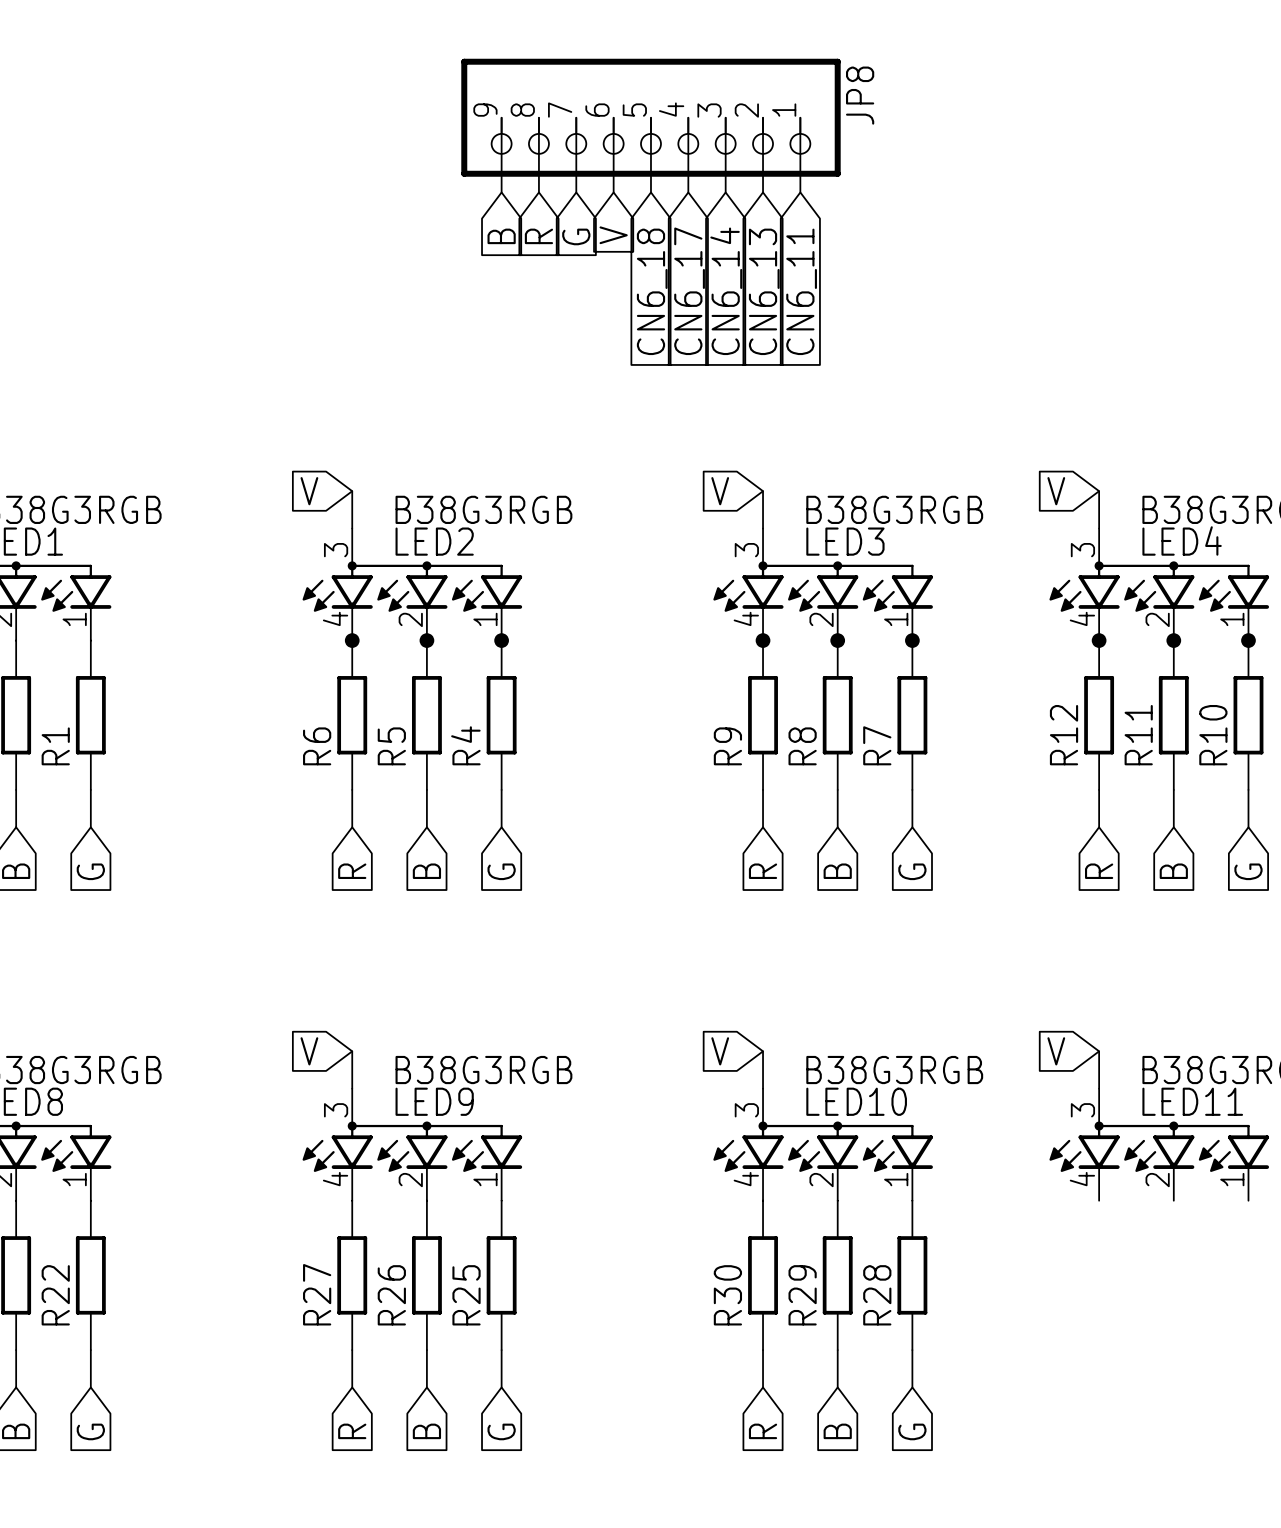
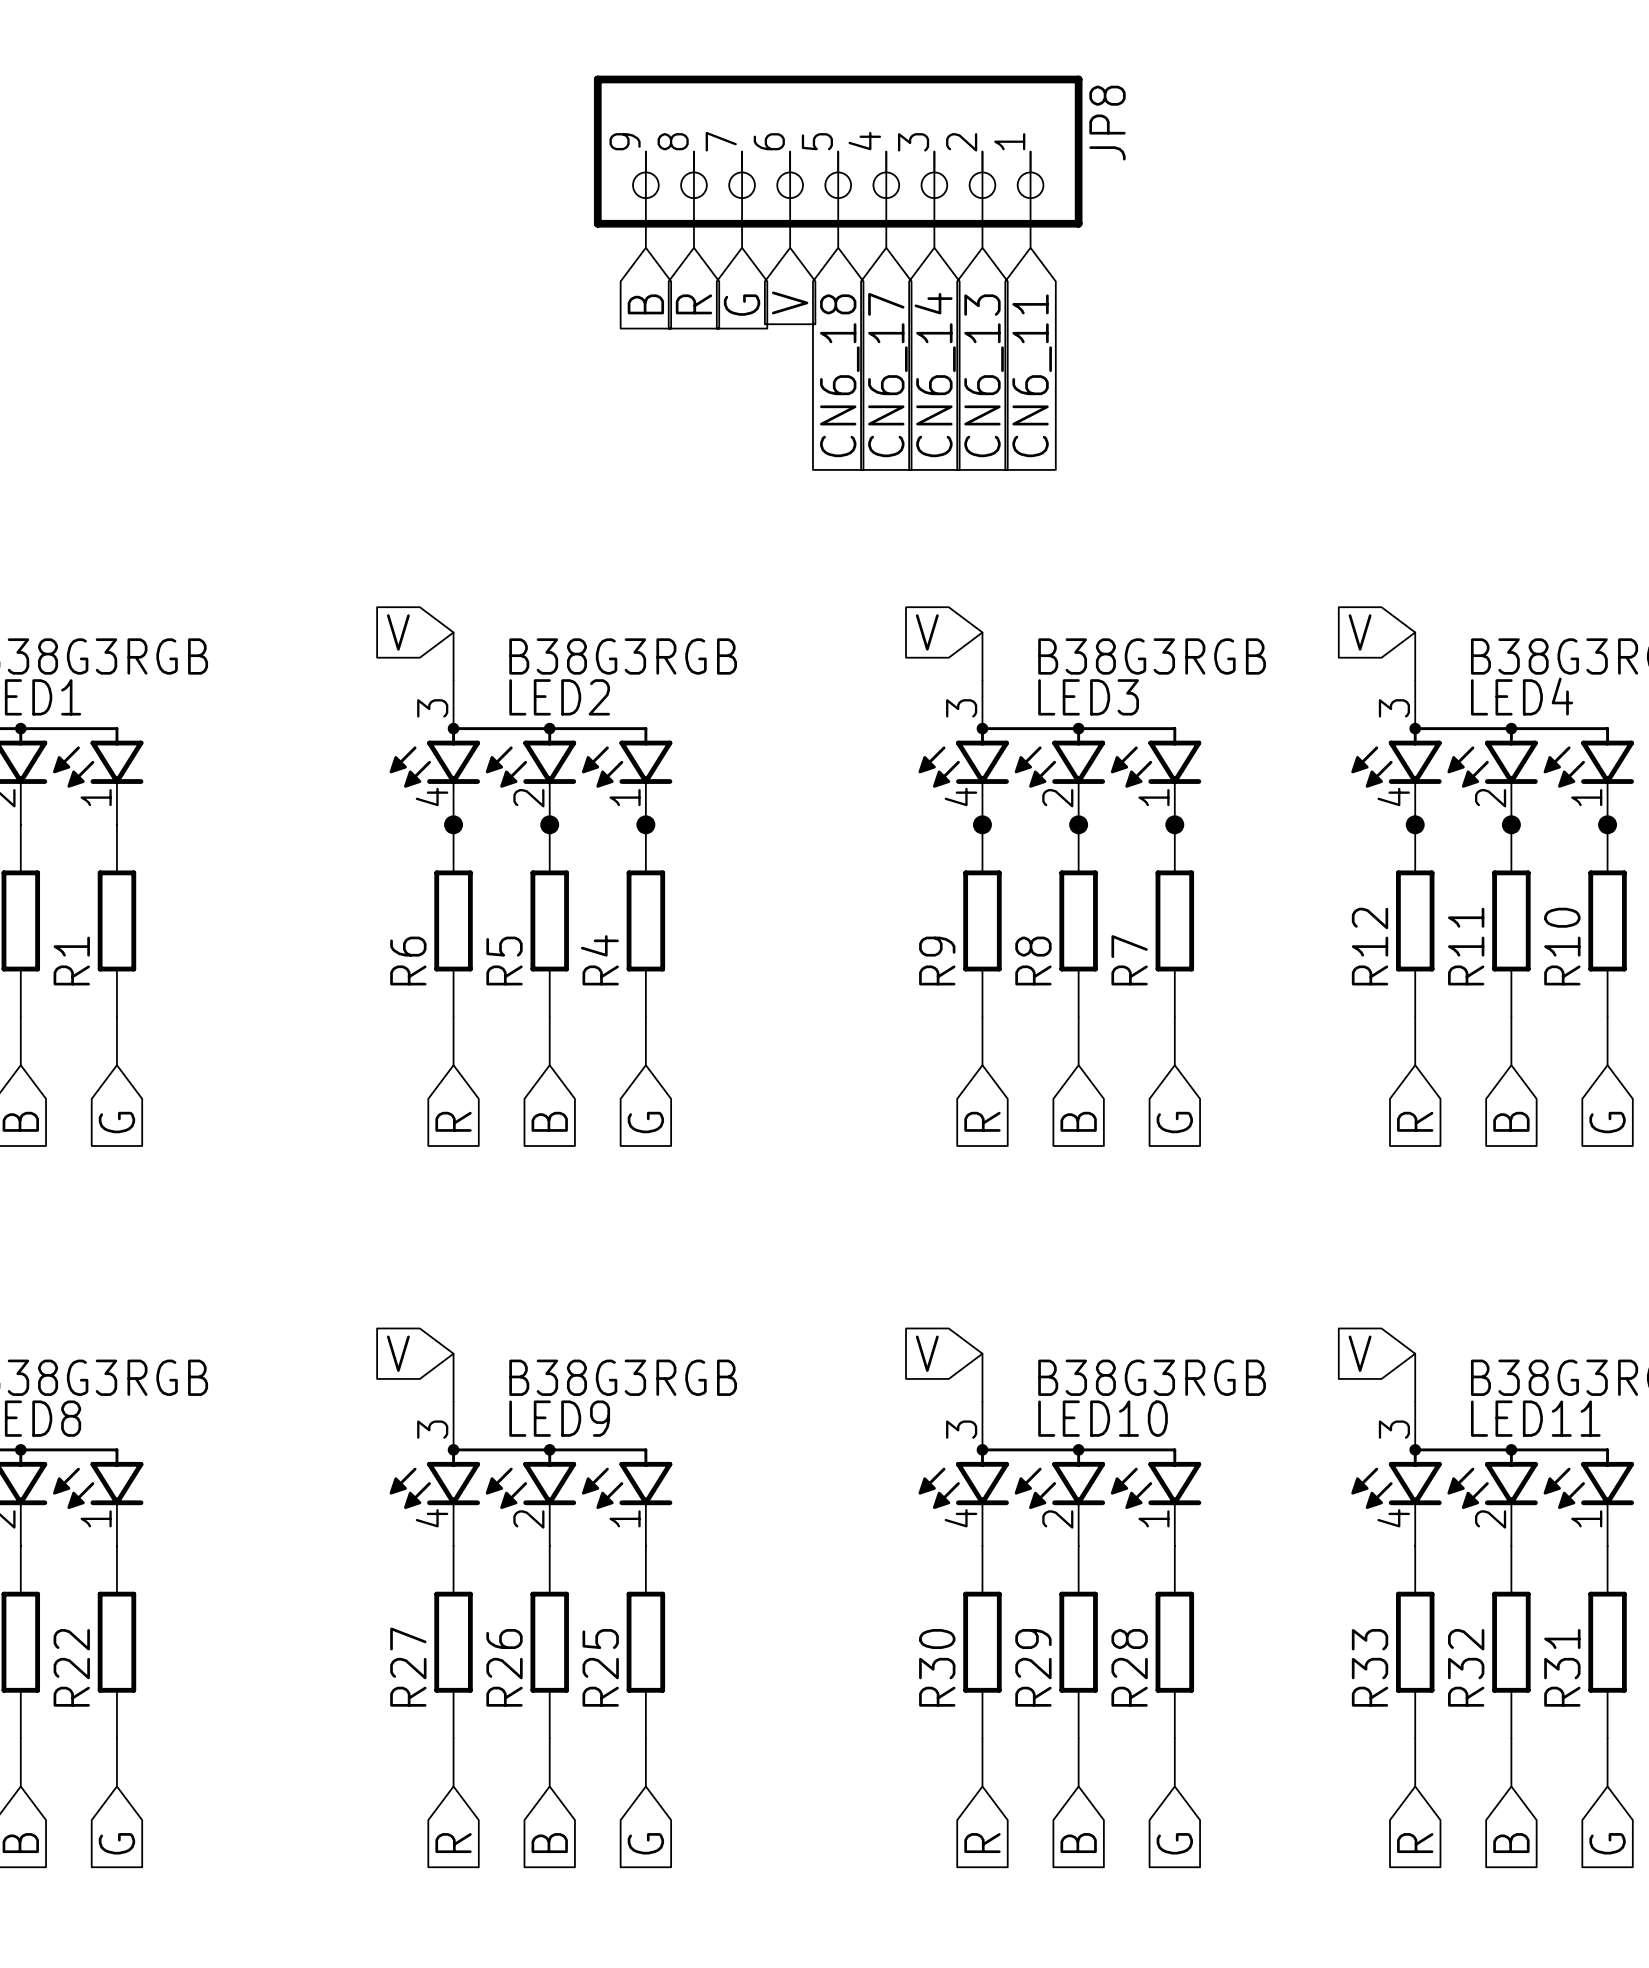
R33: none -> (1415, 1642)
R32: none -> (1511, 1642)
R31: none -> (1607, 1642)
wire: none -> (1415, 1738) (1415, 1786)
wire: none -> (1511, 1738) (1511, 1786)
wire: none -> (1607, 1738) (1607, 1786)
global label: none -> R (1415, 1843)
global label: none -> B (1511, 1843)
global label: none -> G (1607, 1843)

